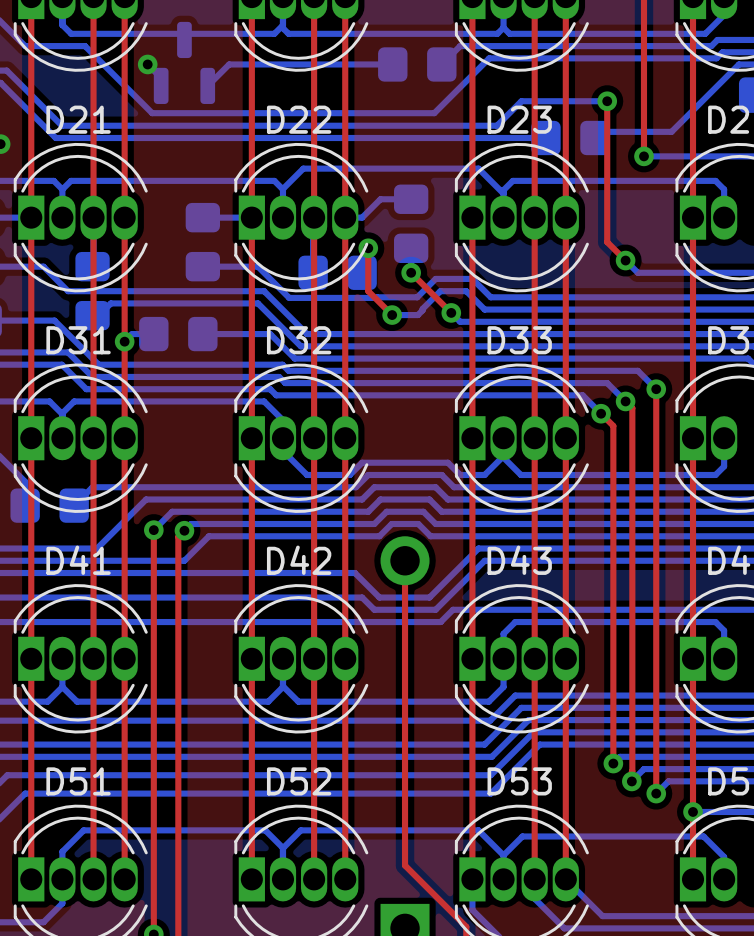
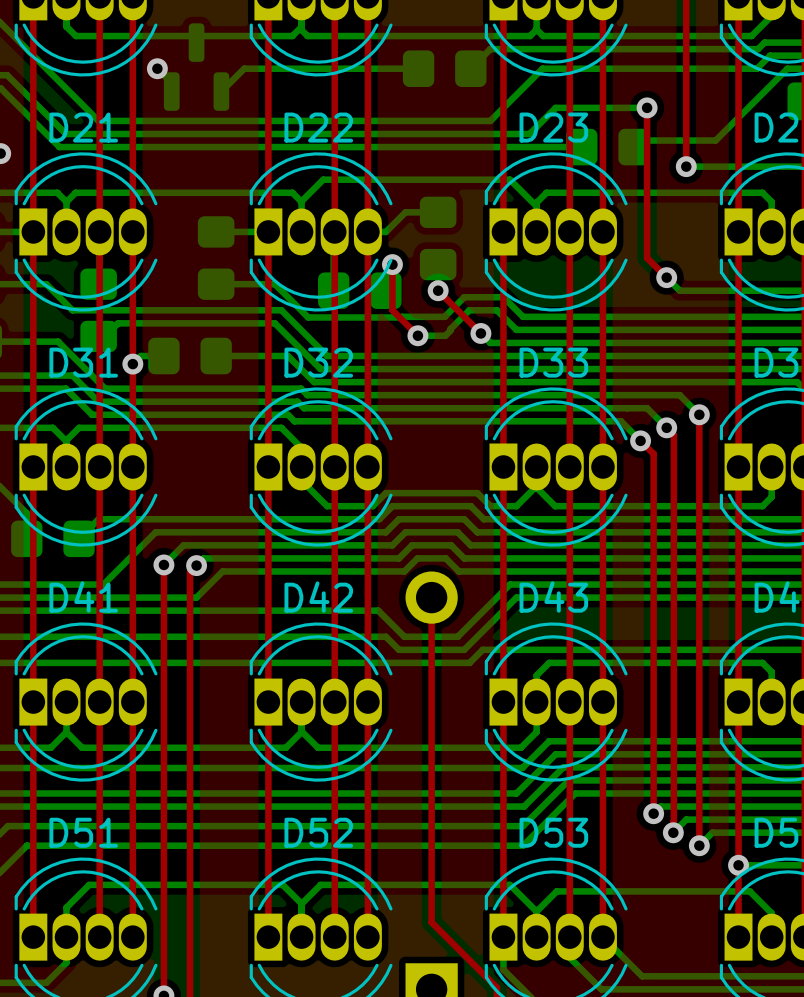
bottom track: (25, 46) (85, 46) (152, 113) (434, 113) (489, 58) (716, 58) -> (26, 49) (98, 120) (490, 120) (542, 68) (756, 68) (763, 62)

